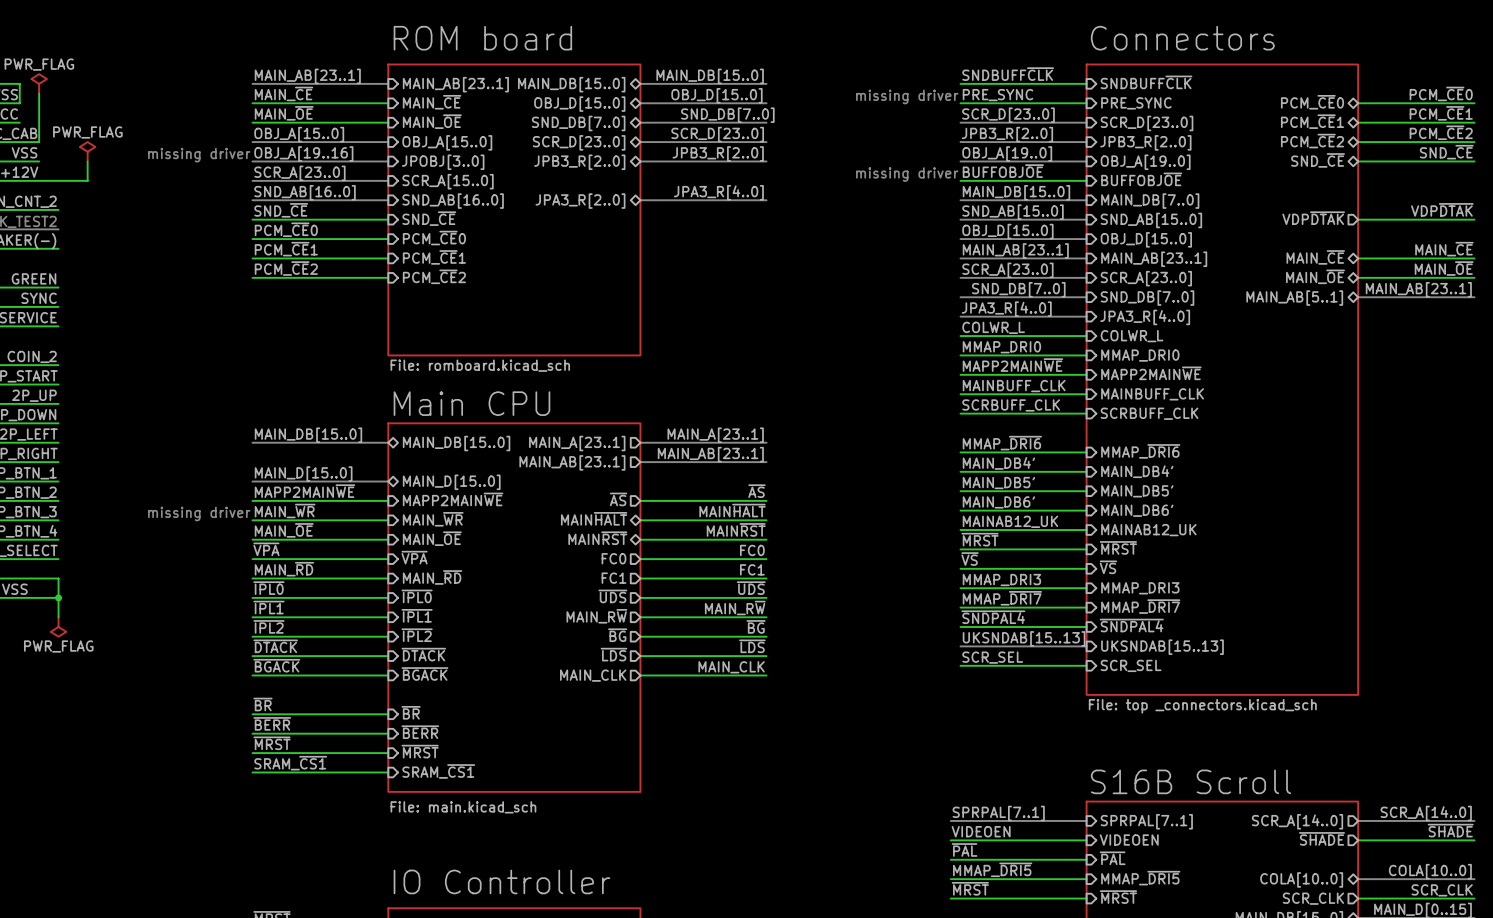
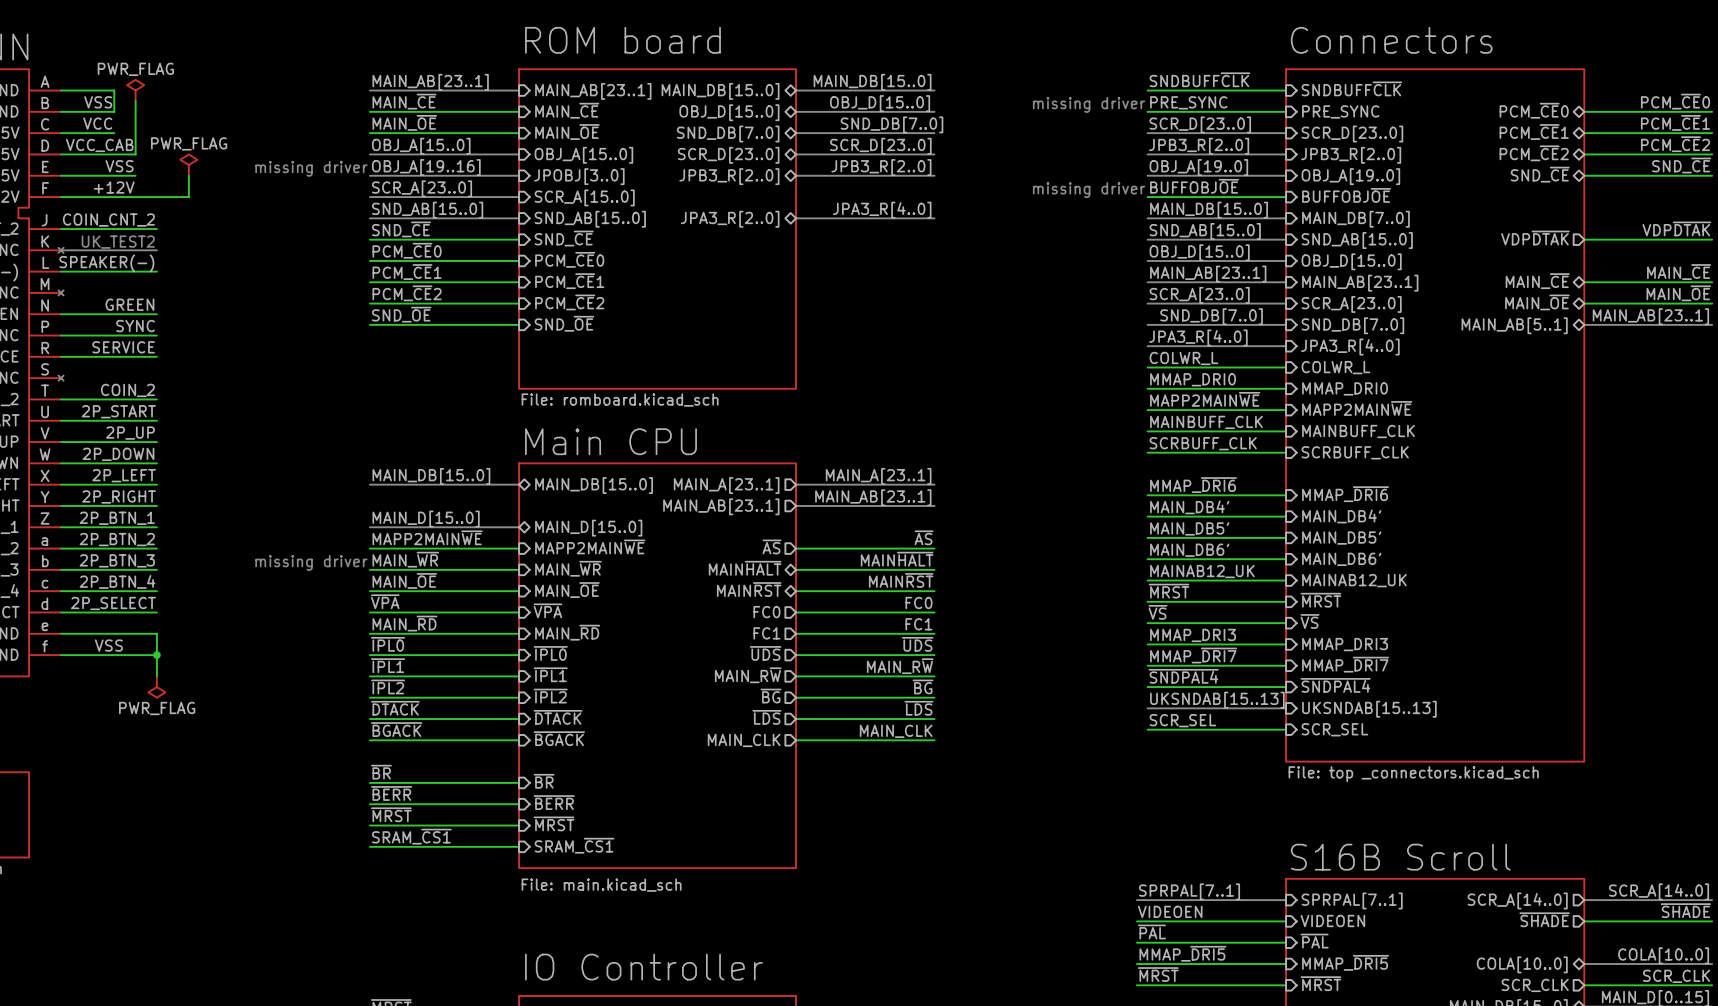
label: SND_AB[16..0] (305, 192) -> SND_AB[15..0] (427, 210)
sheet pin: SND_AB[16..0] (453, 201) -> SND_AB[15..0] (590, 219)
label: none -> SND_~{OE} (401, 314)
sheet pin: none -> SND_~{OE} (564, 323)
wire: none -> (369, 324) (519, 324)

